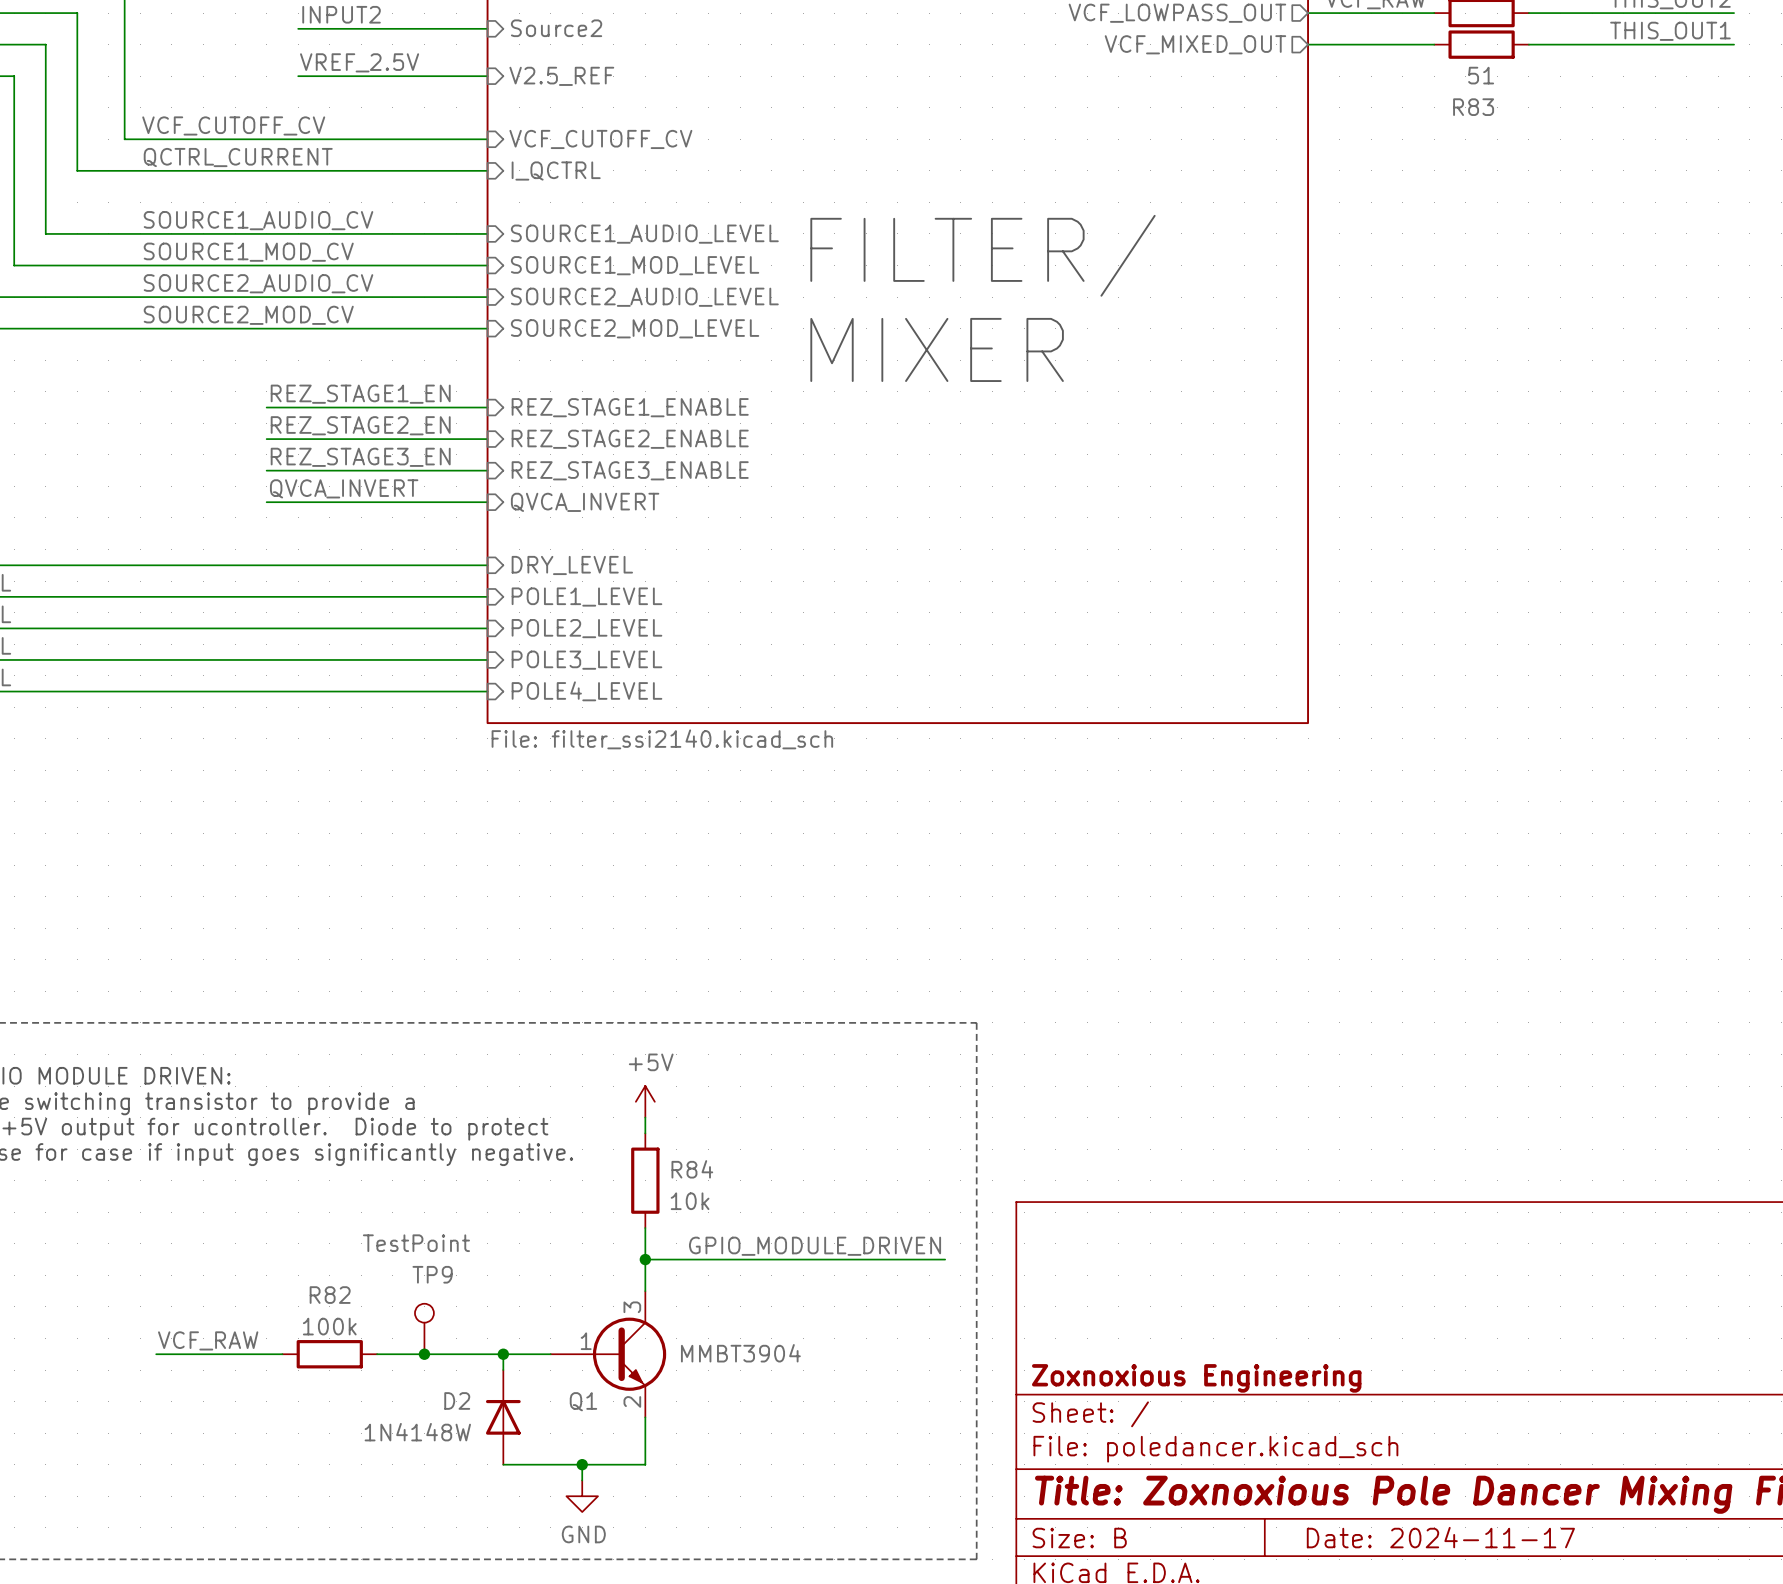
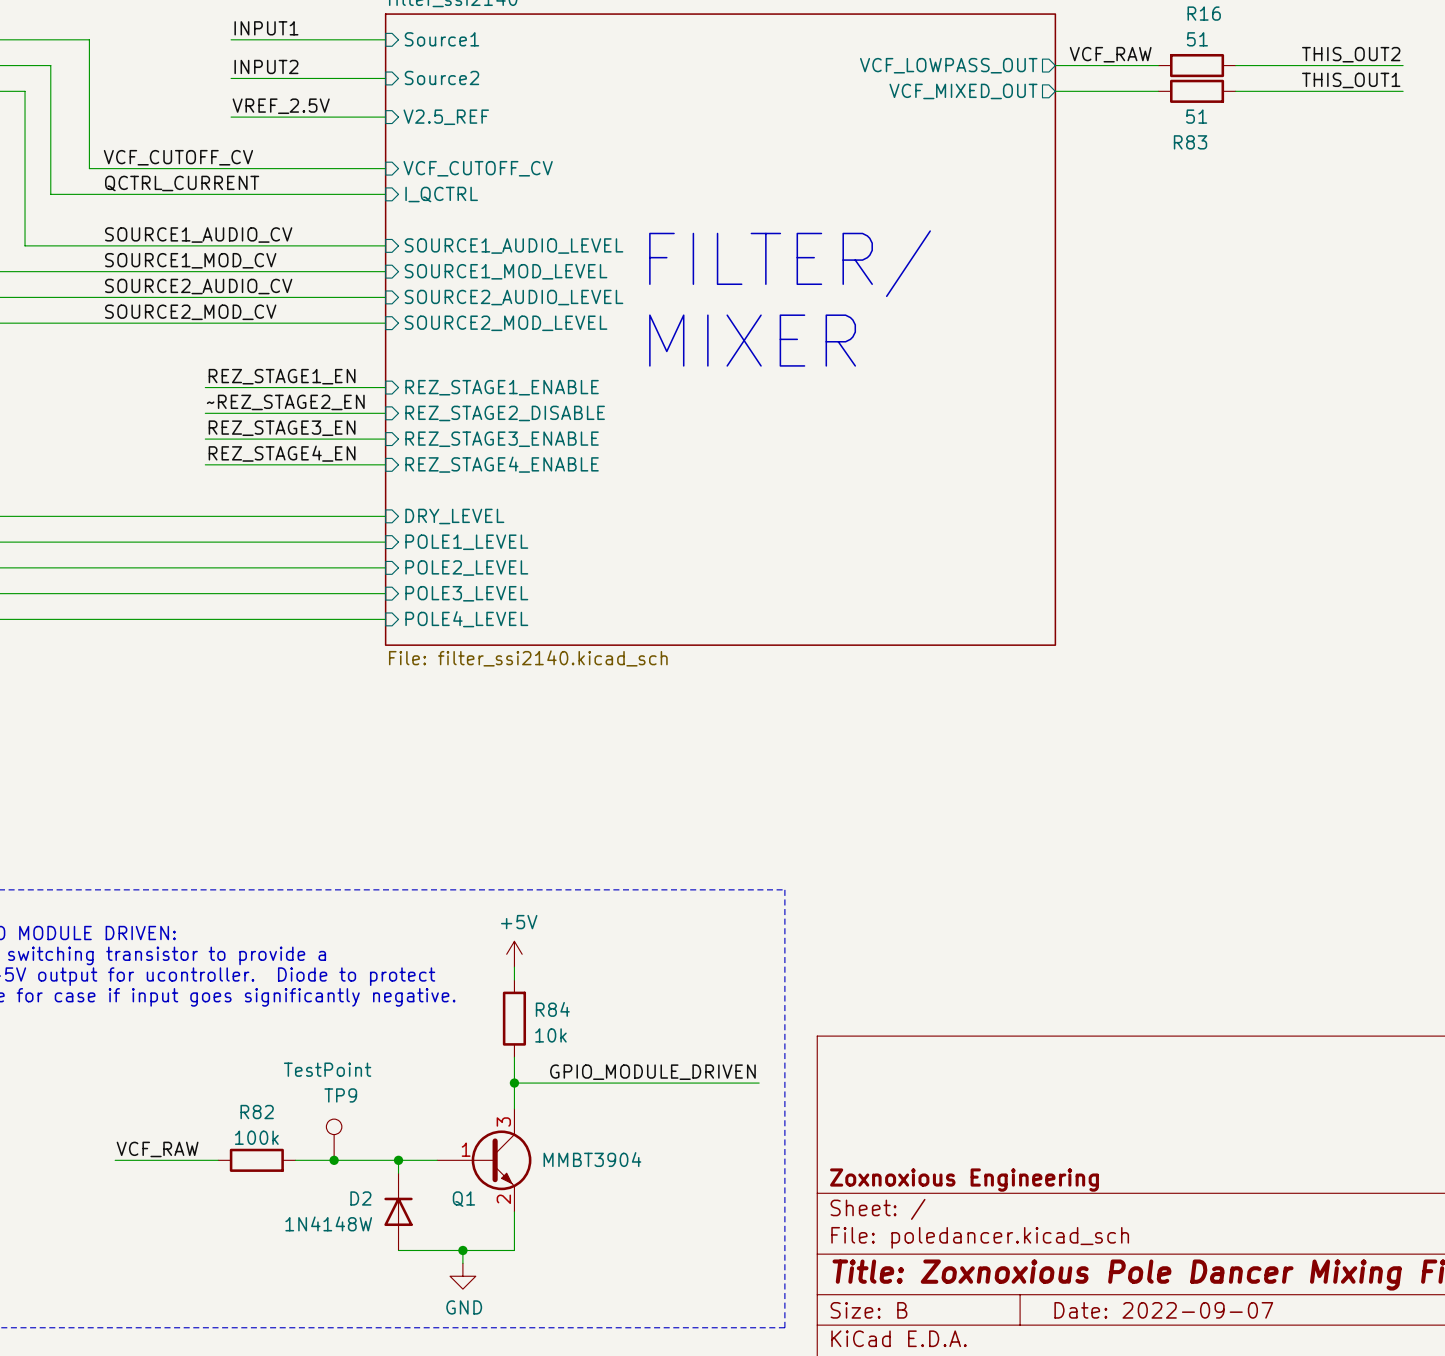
label: REZ_STAGE2_EN (360, 425) -> ~REZ_STAGE2_EN (285, 402)
sheet pin: REZ_STAGE2_ENABLE (630, 439) -> REZ_STAGE2_DISABLE (505, 413)
label: QVCA_INVERT (344, 488) -> REZ_STAGE4_EN (282, 453)
sheet pin: QVCA_INVERT (585, 502) -> REZ_STAGE4_ENABLE (502, 464)
title block: Date: 2024-11-17 (1440, 1537) -> Date: 2022-09-07 (1163, 1310)

